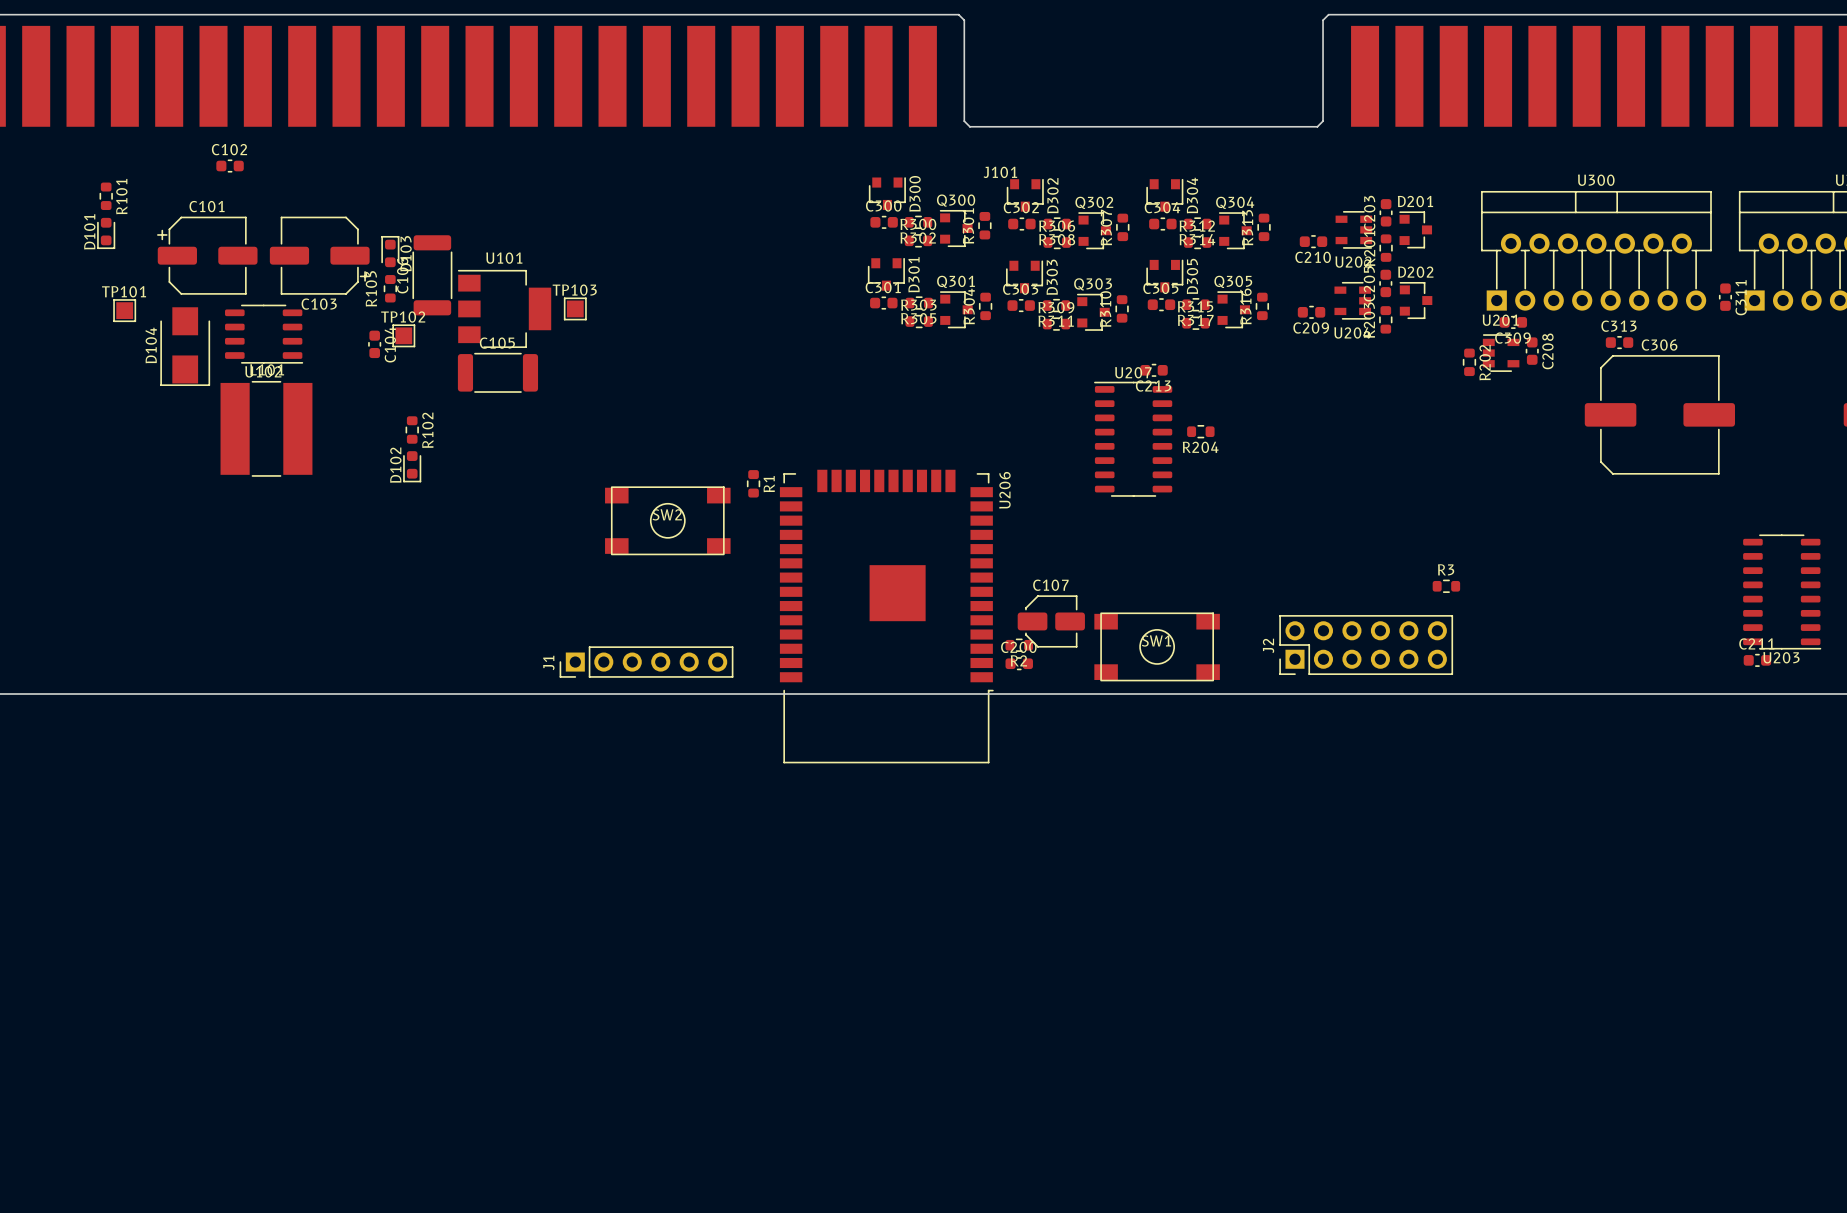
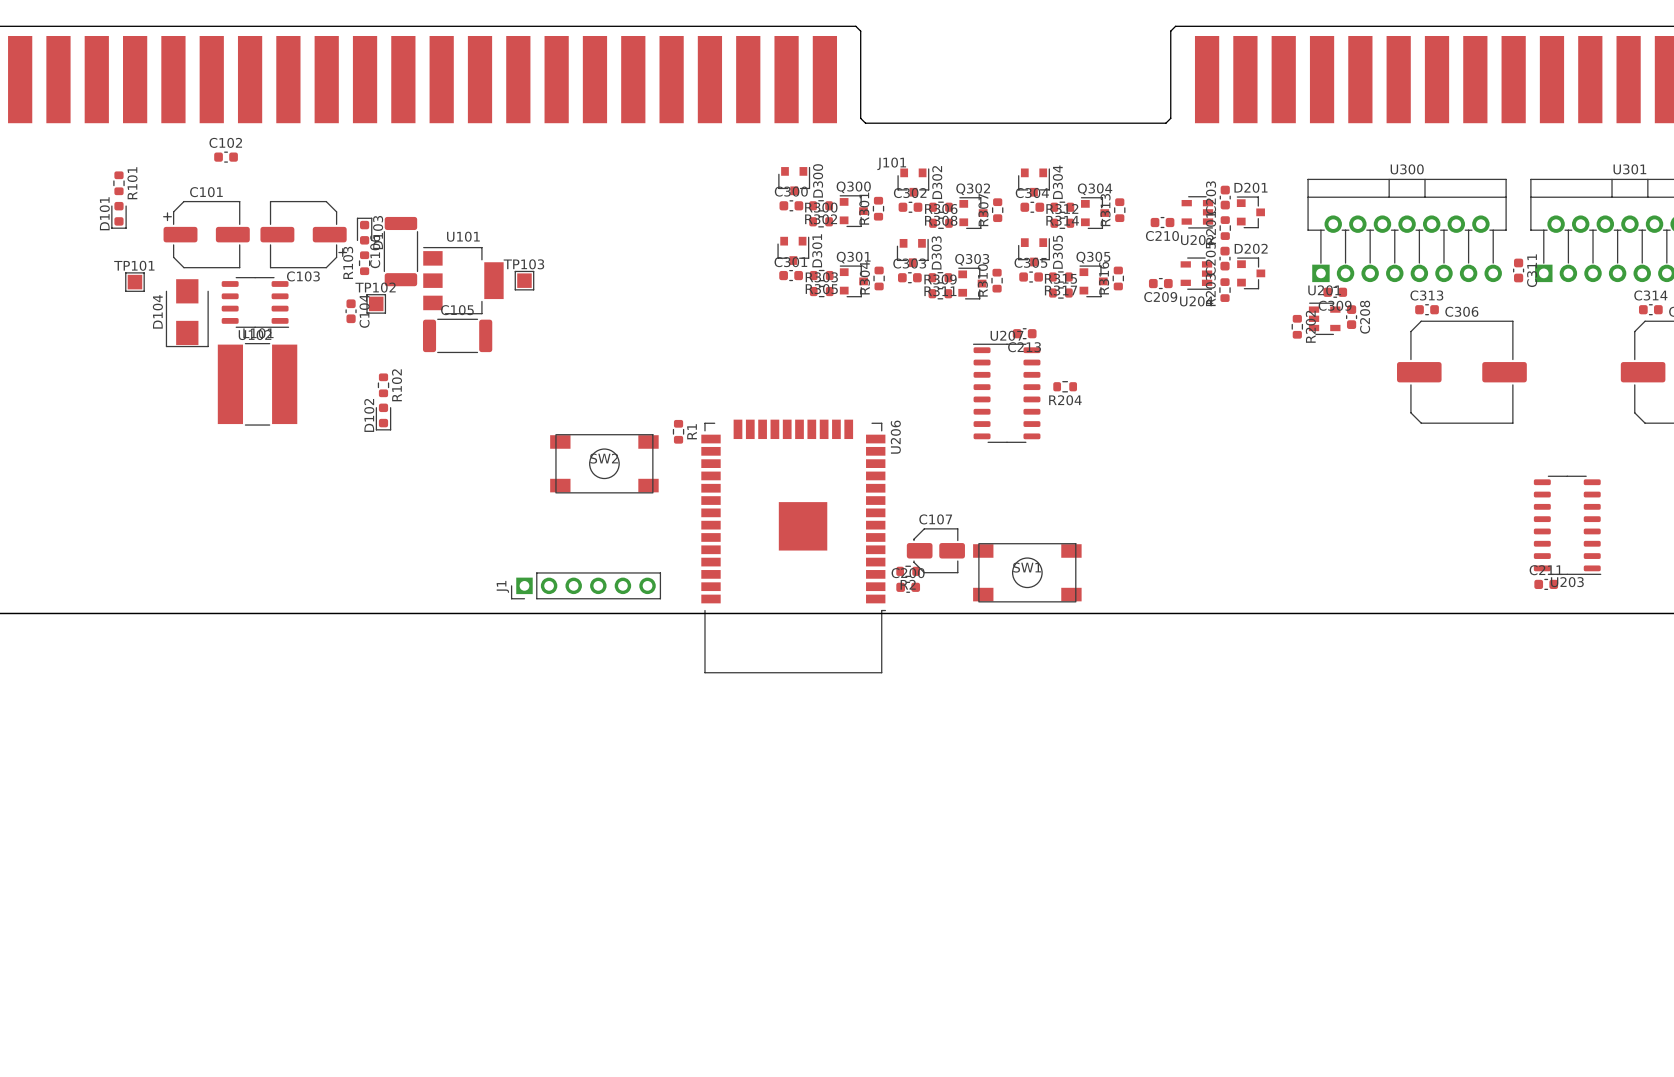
R3: (1446, 586) -> none
J2: (1366, 645) -> none

